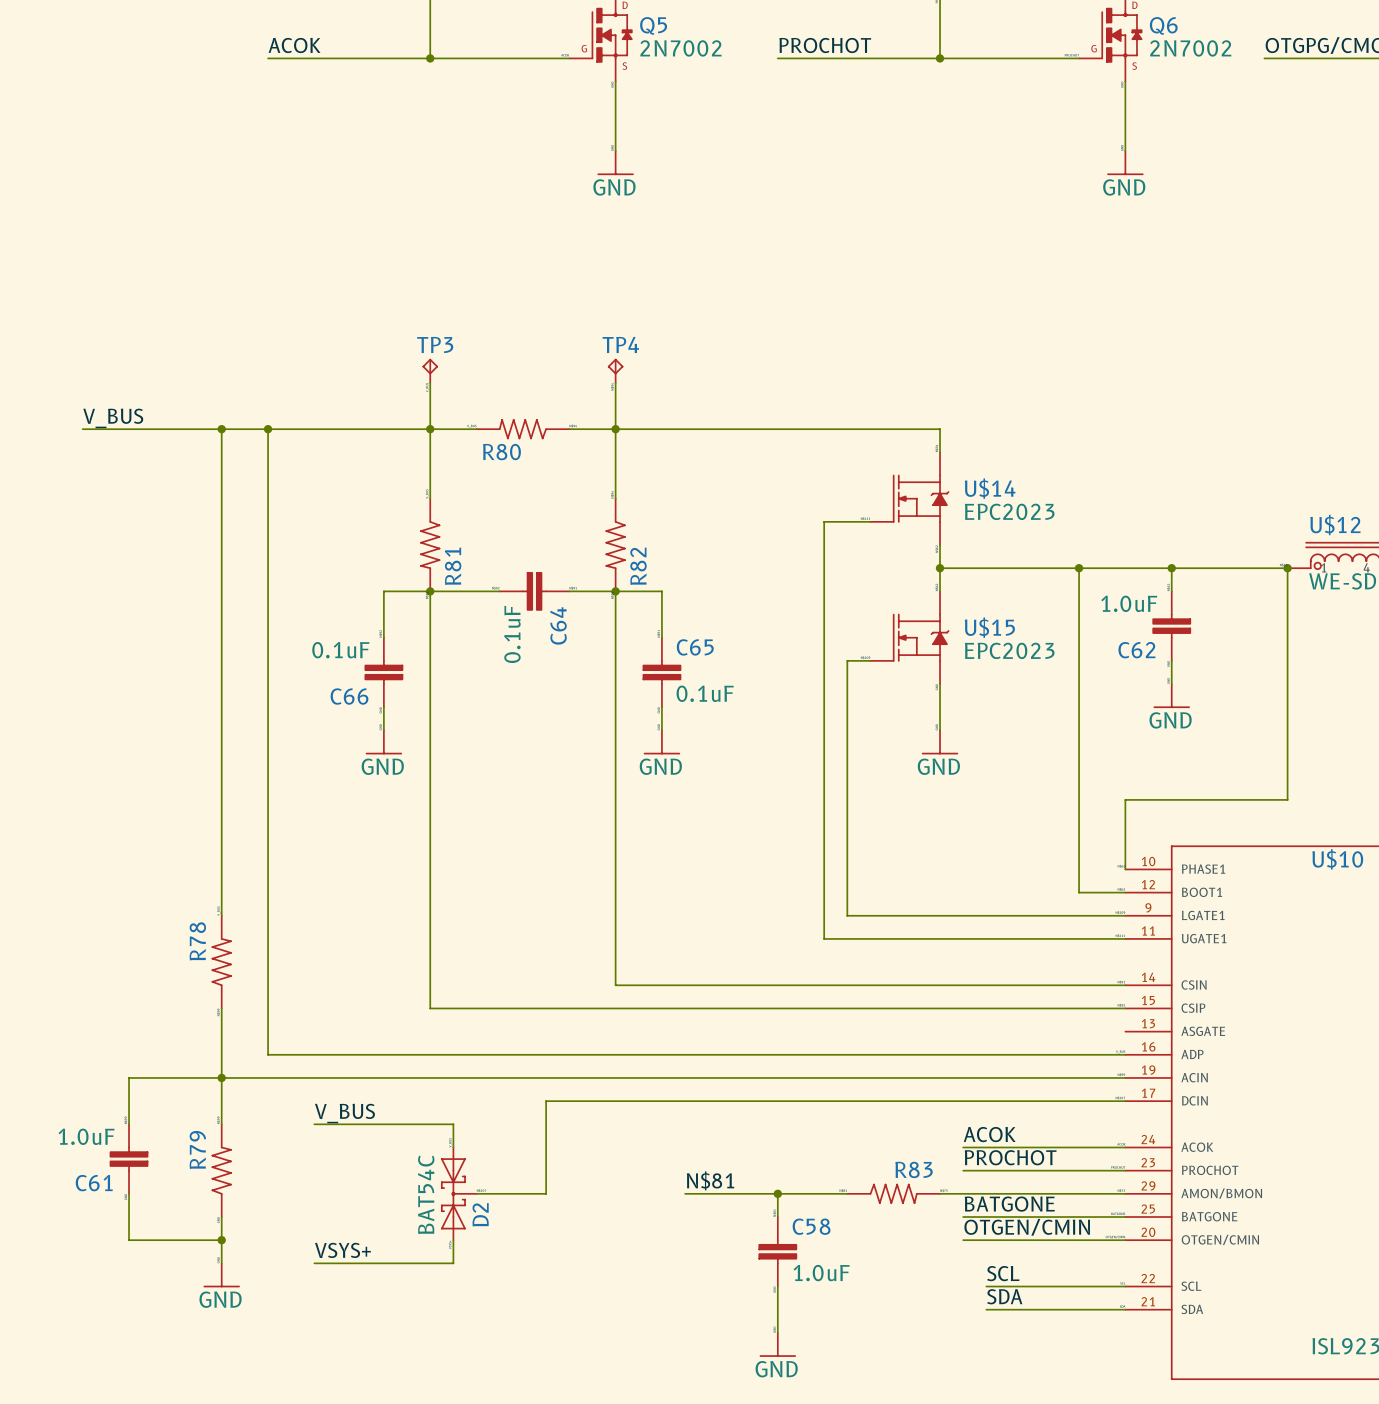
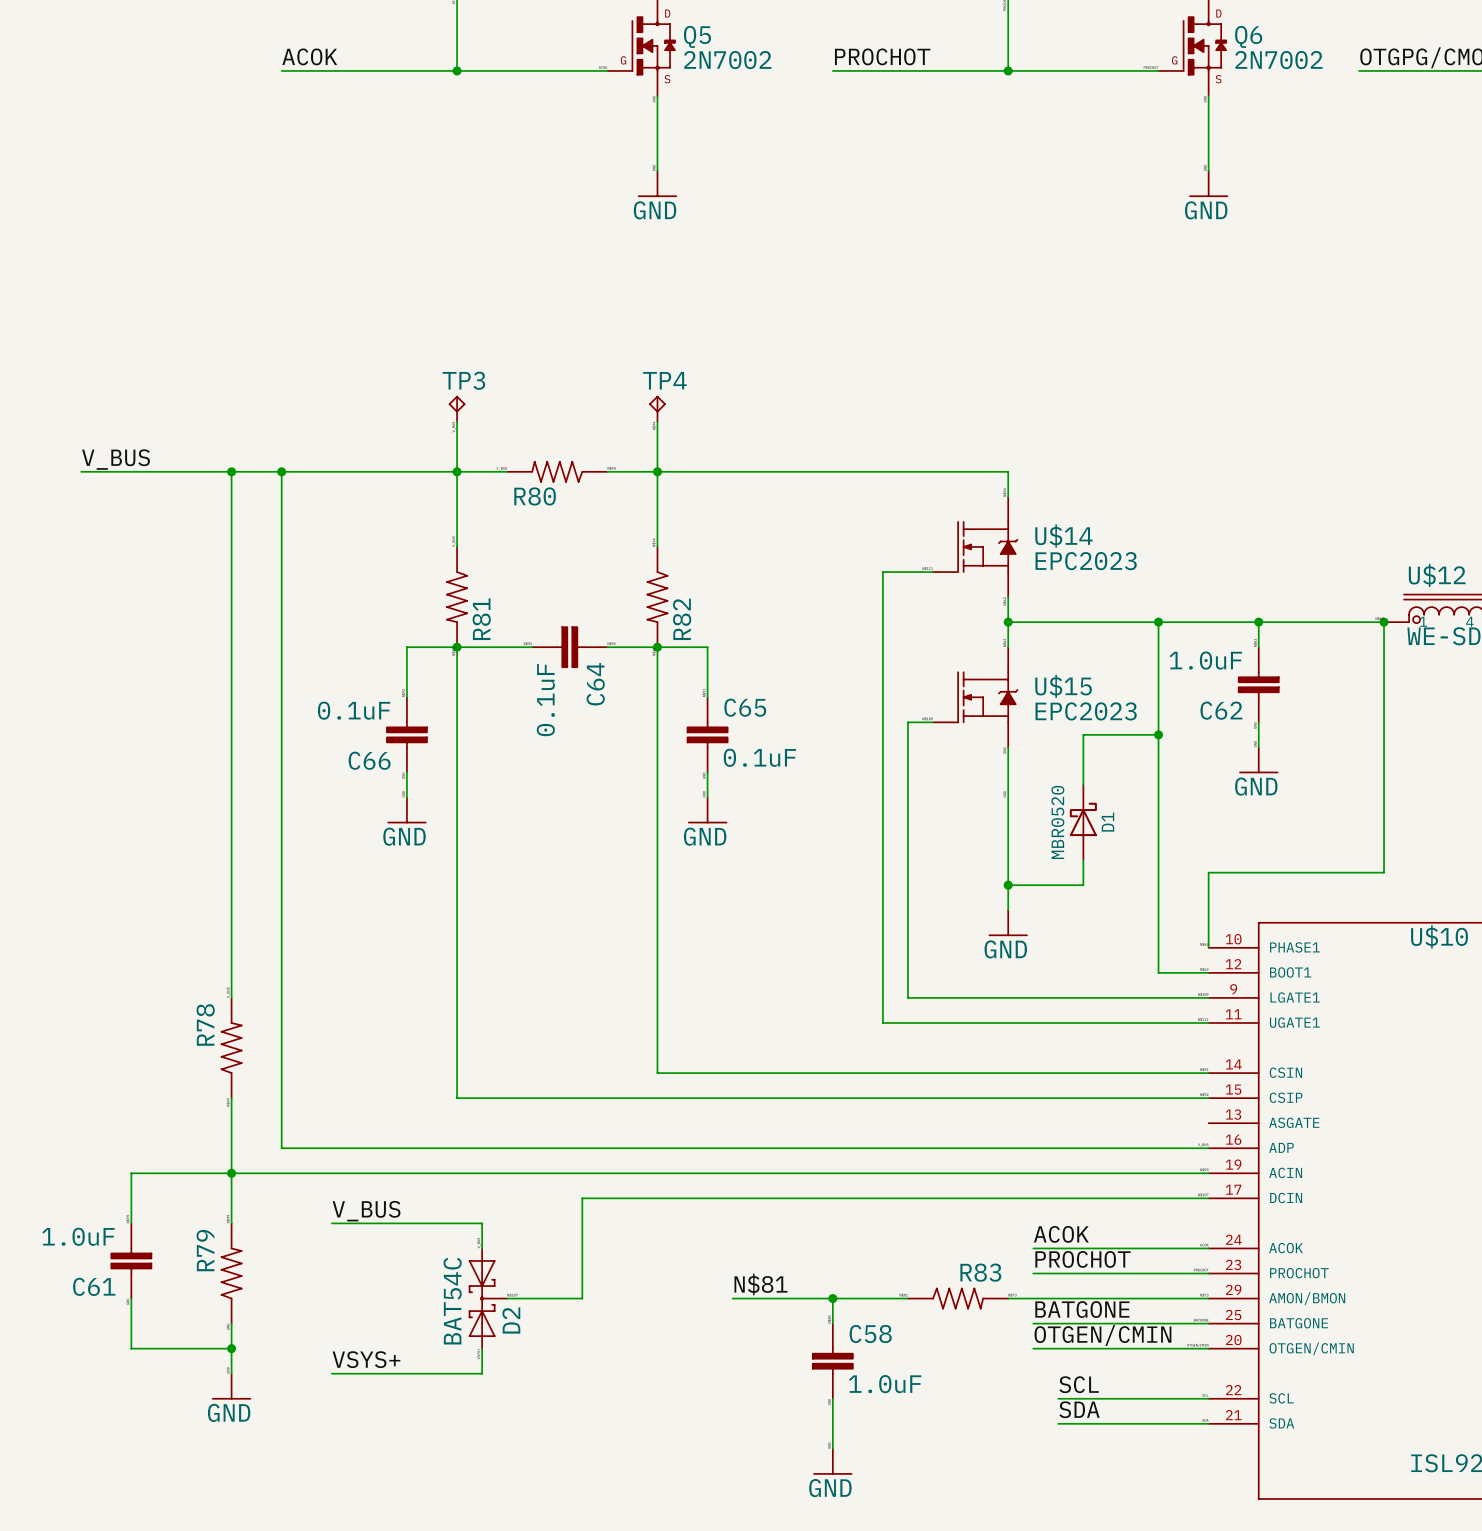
wire: none -> (1158, 734) (1083, 734) (1083, 784)
junction: none -> (1158, 734)
wire: none -> (1008, 797) (1008, 910)
power symbol position: GND (940, 741) -> GND (1008, 922)
D1: none -> MBR0520 (1083, 822)
wire: none -> (1083, 860) (1083, 885) (1008, 885)
junction: none -> (1008, 885)

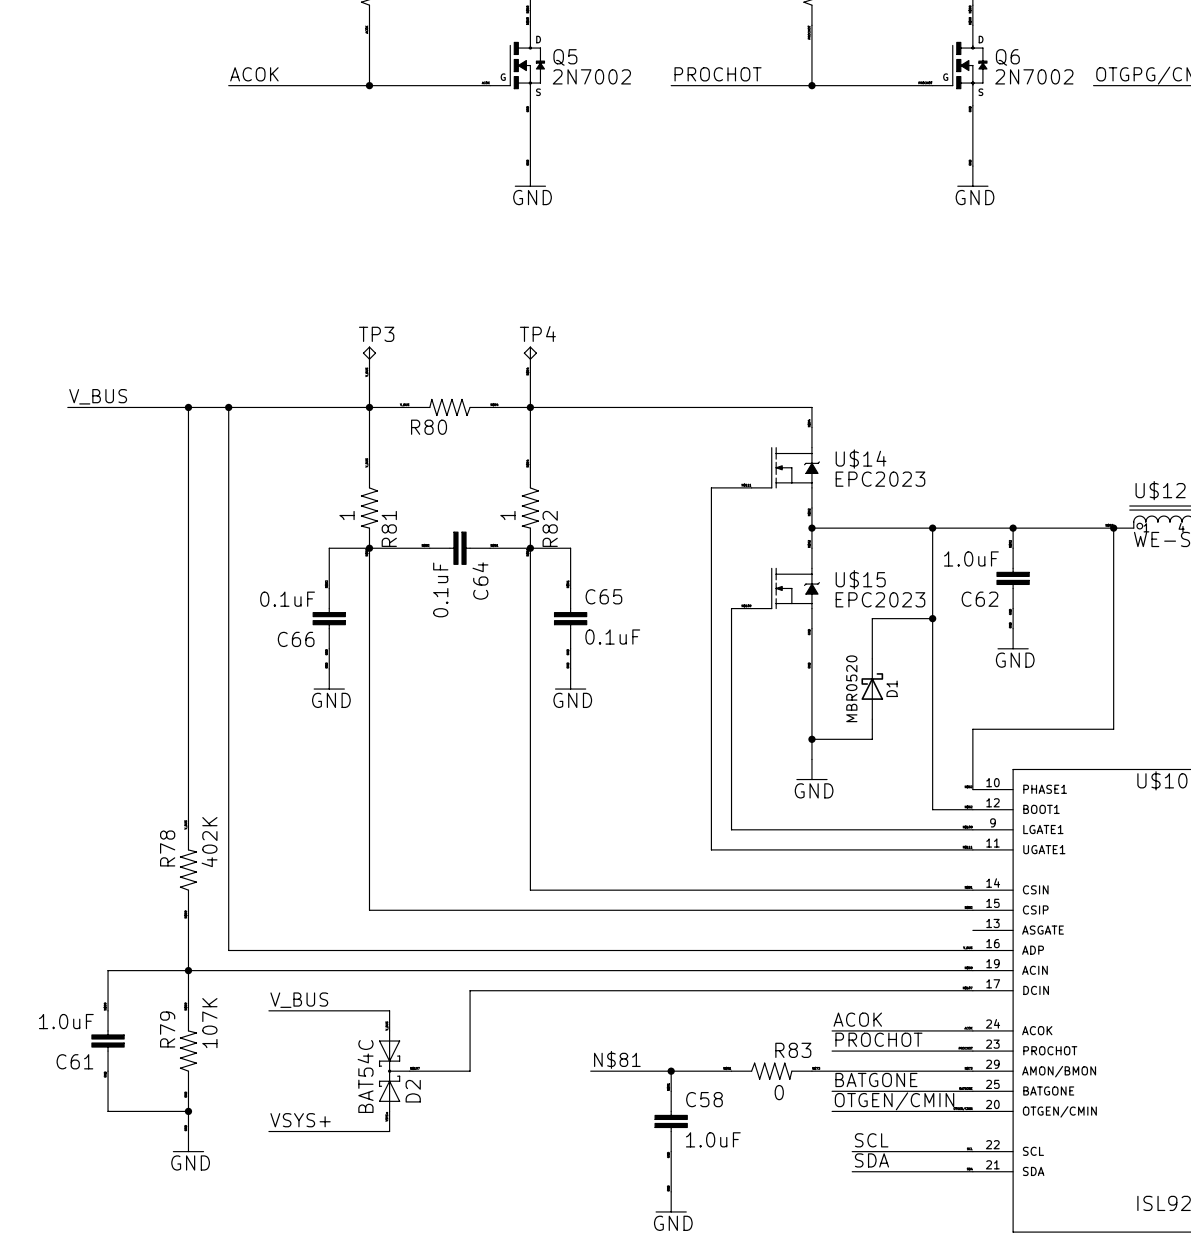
R81 value: none -> 1 (347, 515)
R82 value: none -> 1 (507, 515)
R78 value: none -> 402K (209, 842)
R79 value: none -> 107K (209, 1023)
R83 value: none -> 0 (779, 1092)

